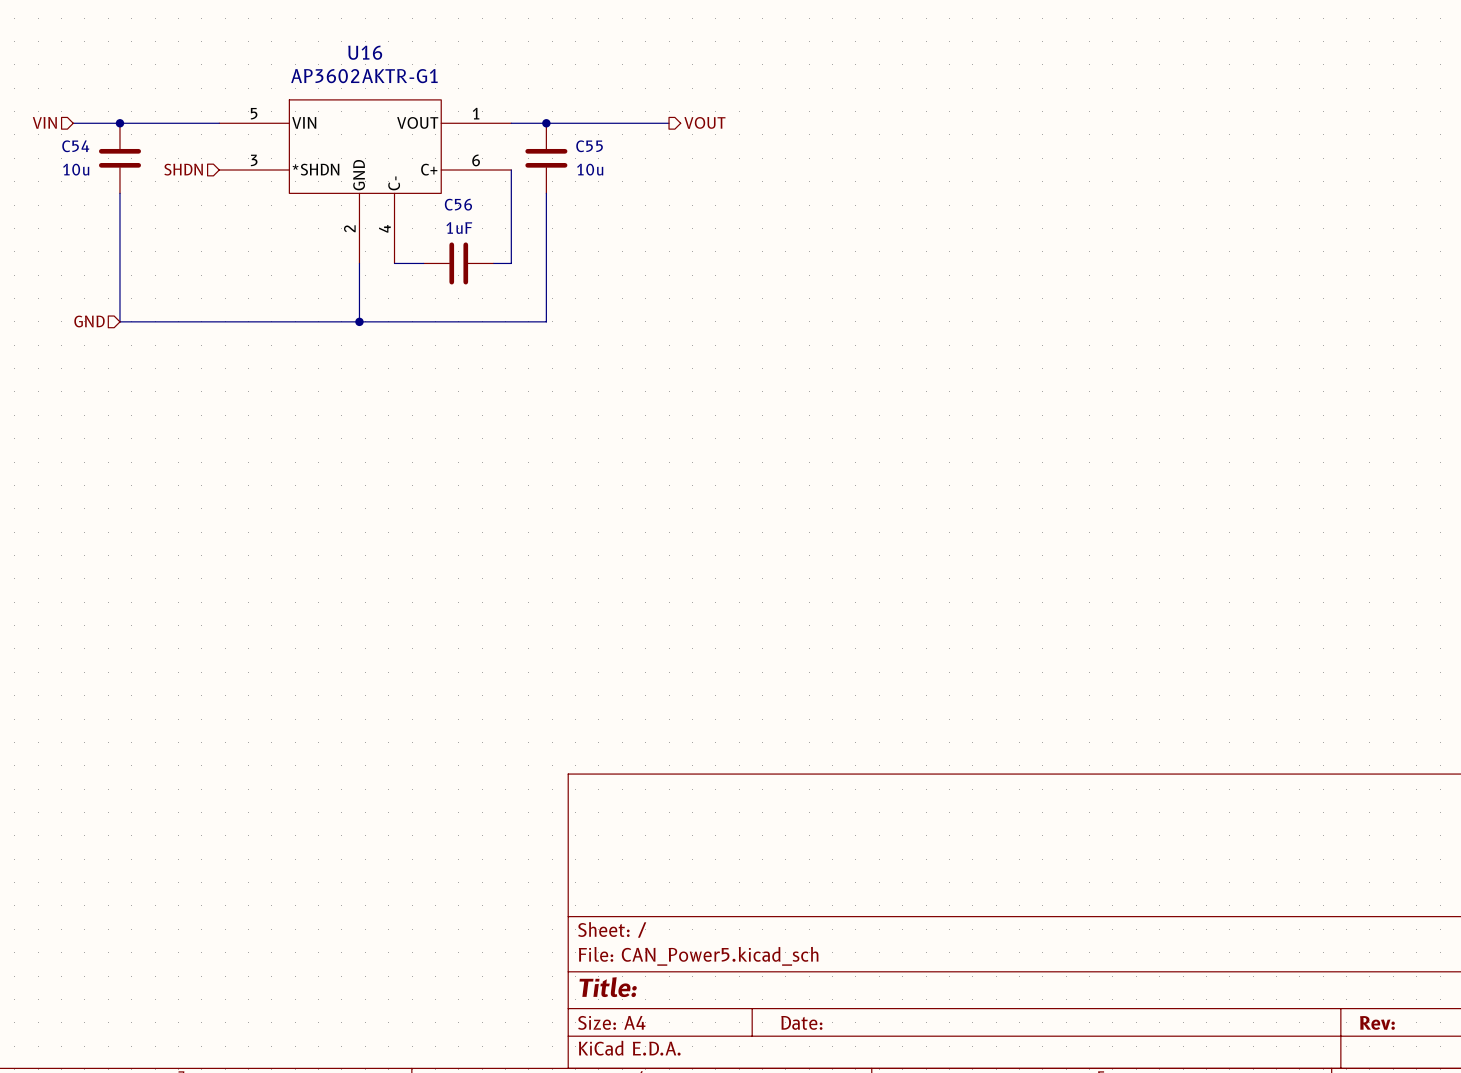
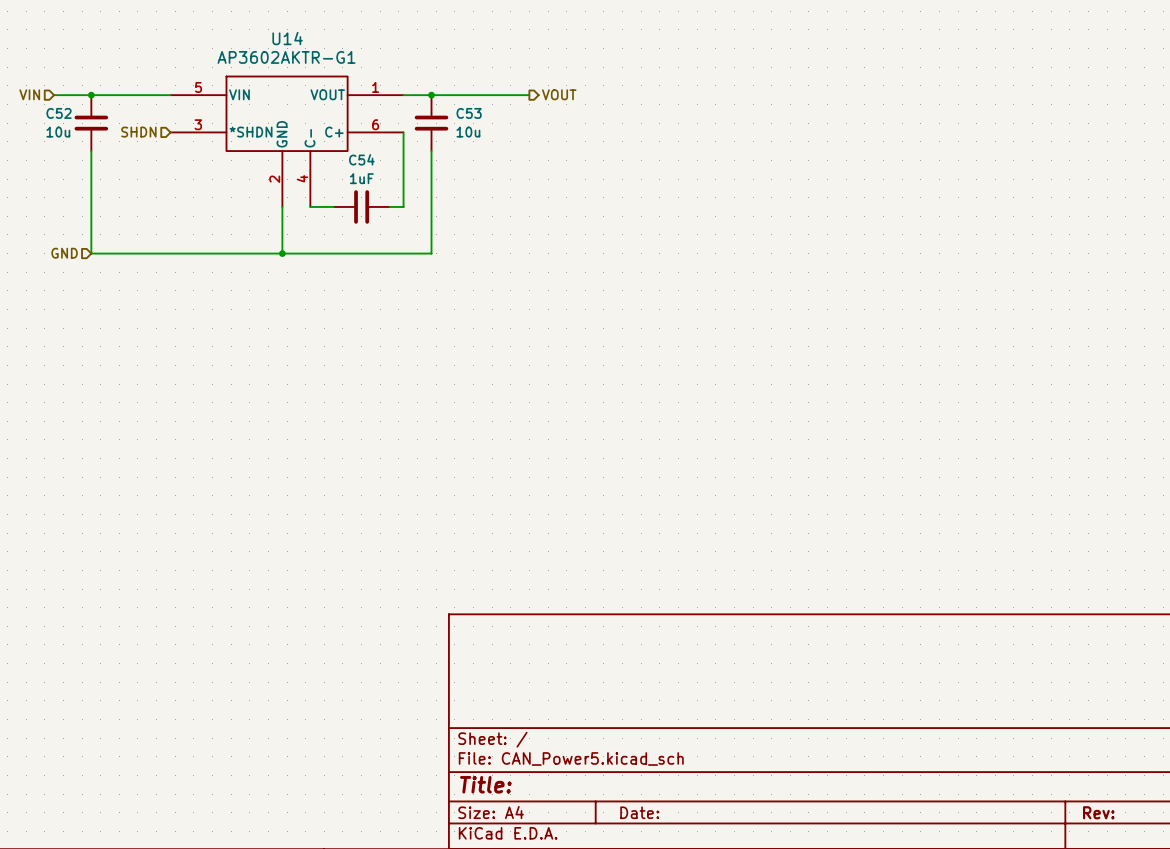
U16 name: U16 (365, 52) -> U14 (287, 38)
C54 name: C54 (75, 146) -> C52 (59, 113)
C55 name: C55 (589, 146) -> C53 (469, 113)
C56 name: C56 (458, 204) -> C54 (361, 159)

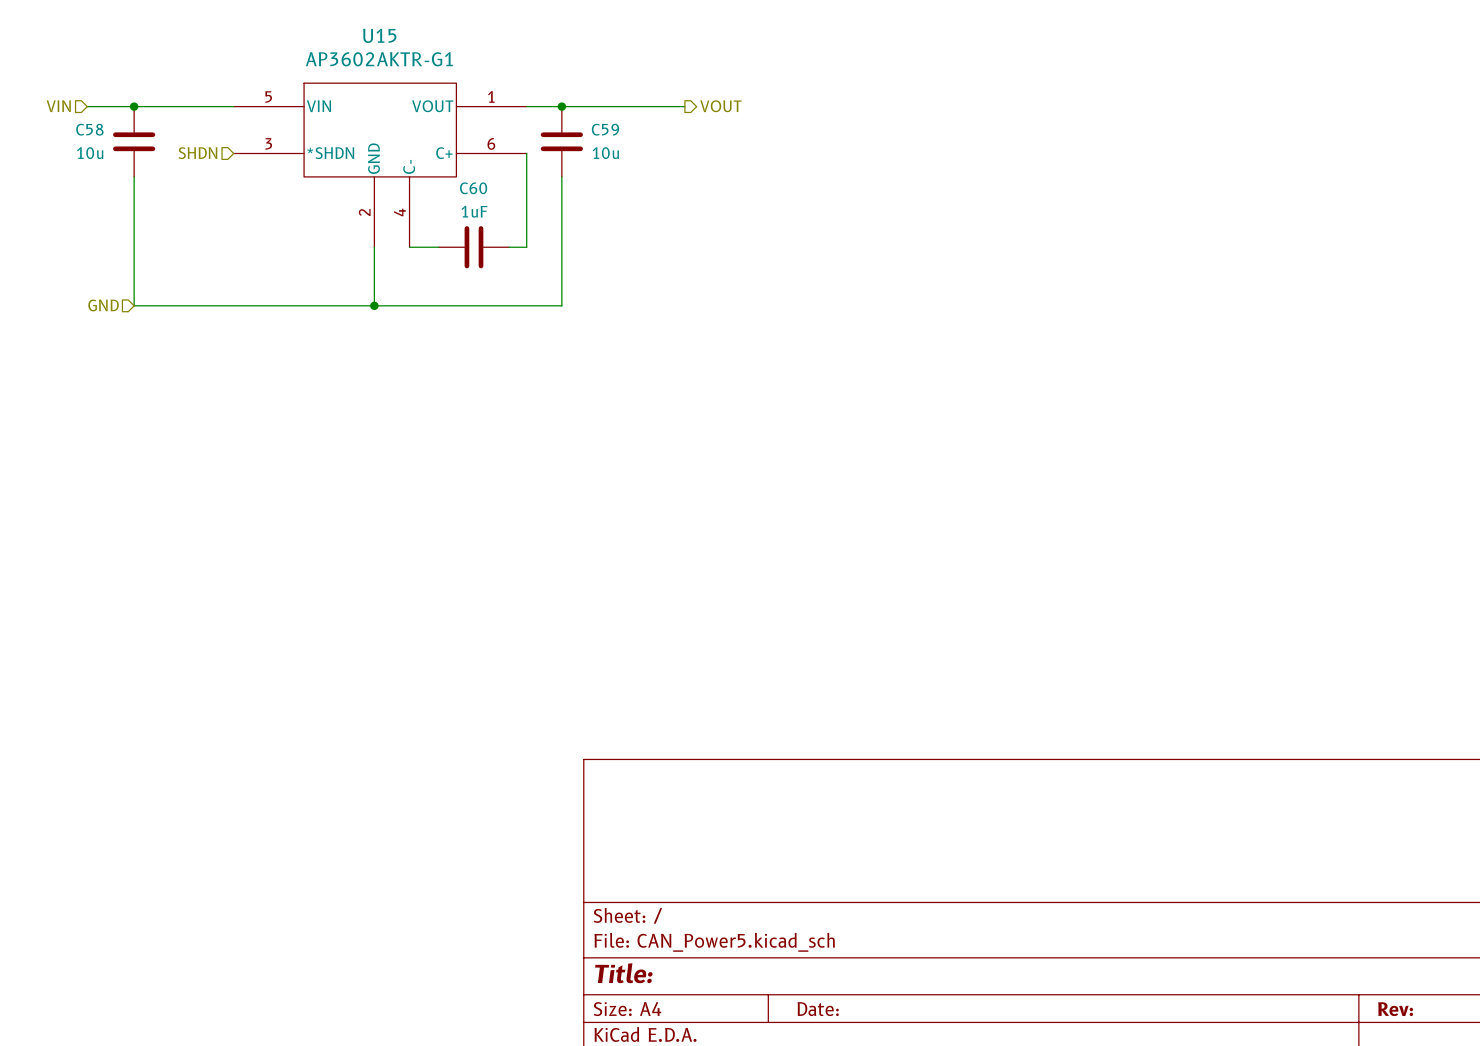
U14 name: U14 (287, 38) -> U15 (379, 35)
C52 name: C52 (59, 113) -> C58 (89, 129)
C53 name: C53 (469, 113) -> C59 (605, 129)
C54 name: C54 (361, 159) -> C60 (473, 188)

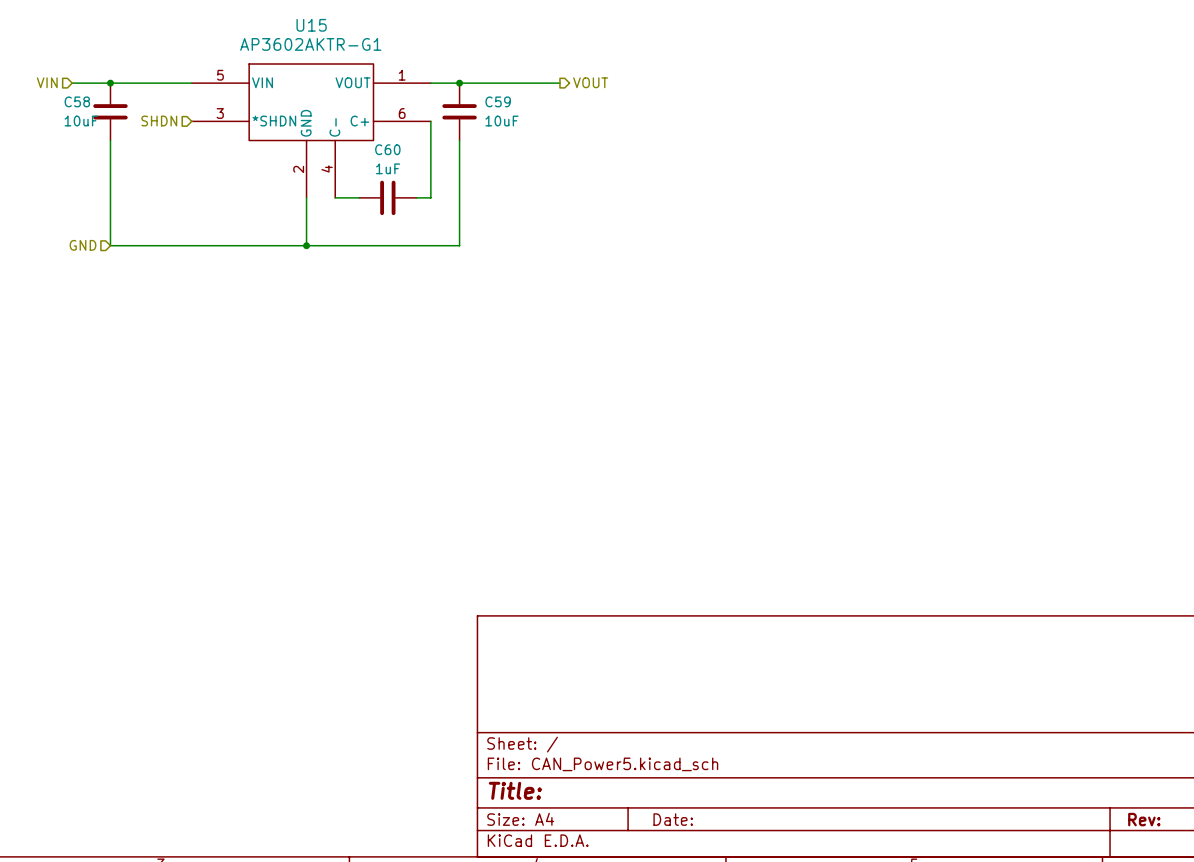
C58 value: 10u (90, 153) -> 10uF (81, 121)
C59 value: 10u (605, 153) -> 10uF (501, 121)

